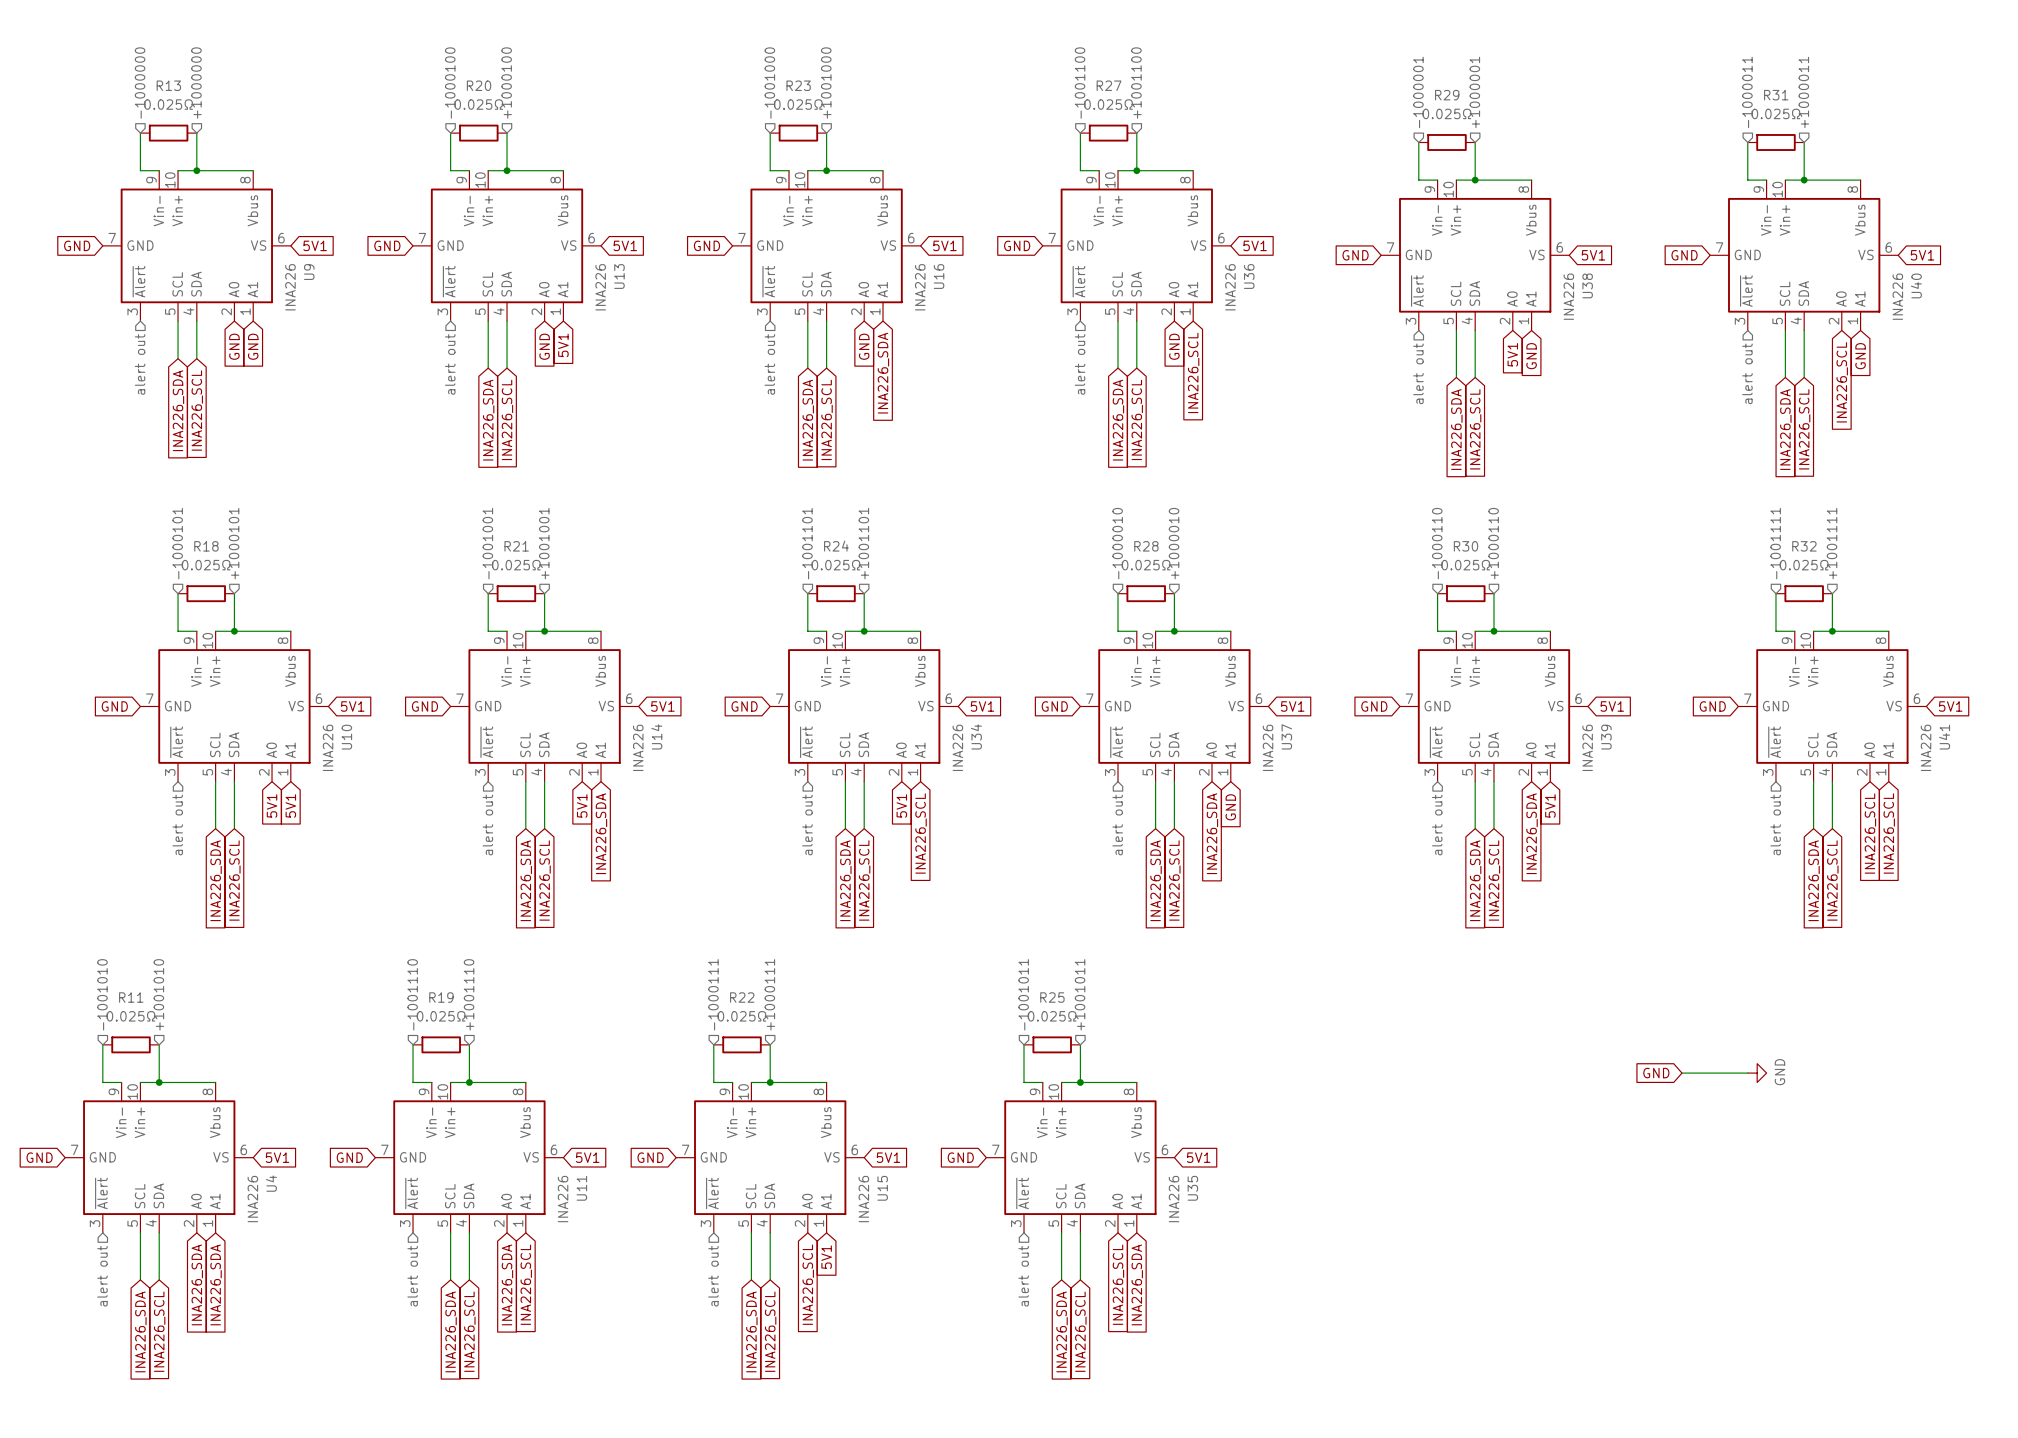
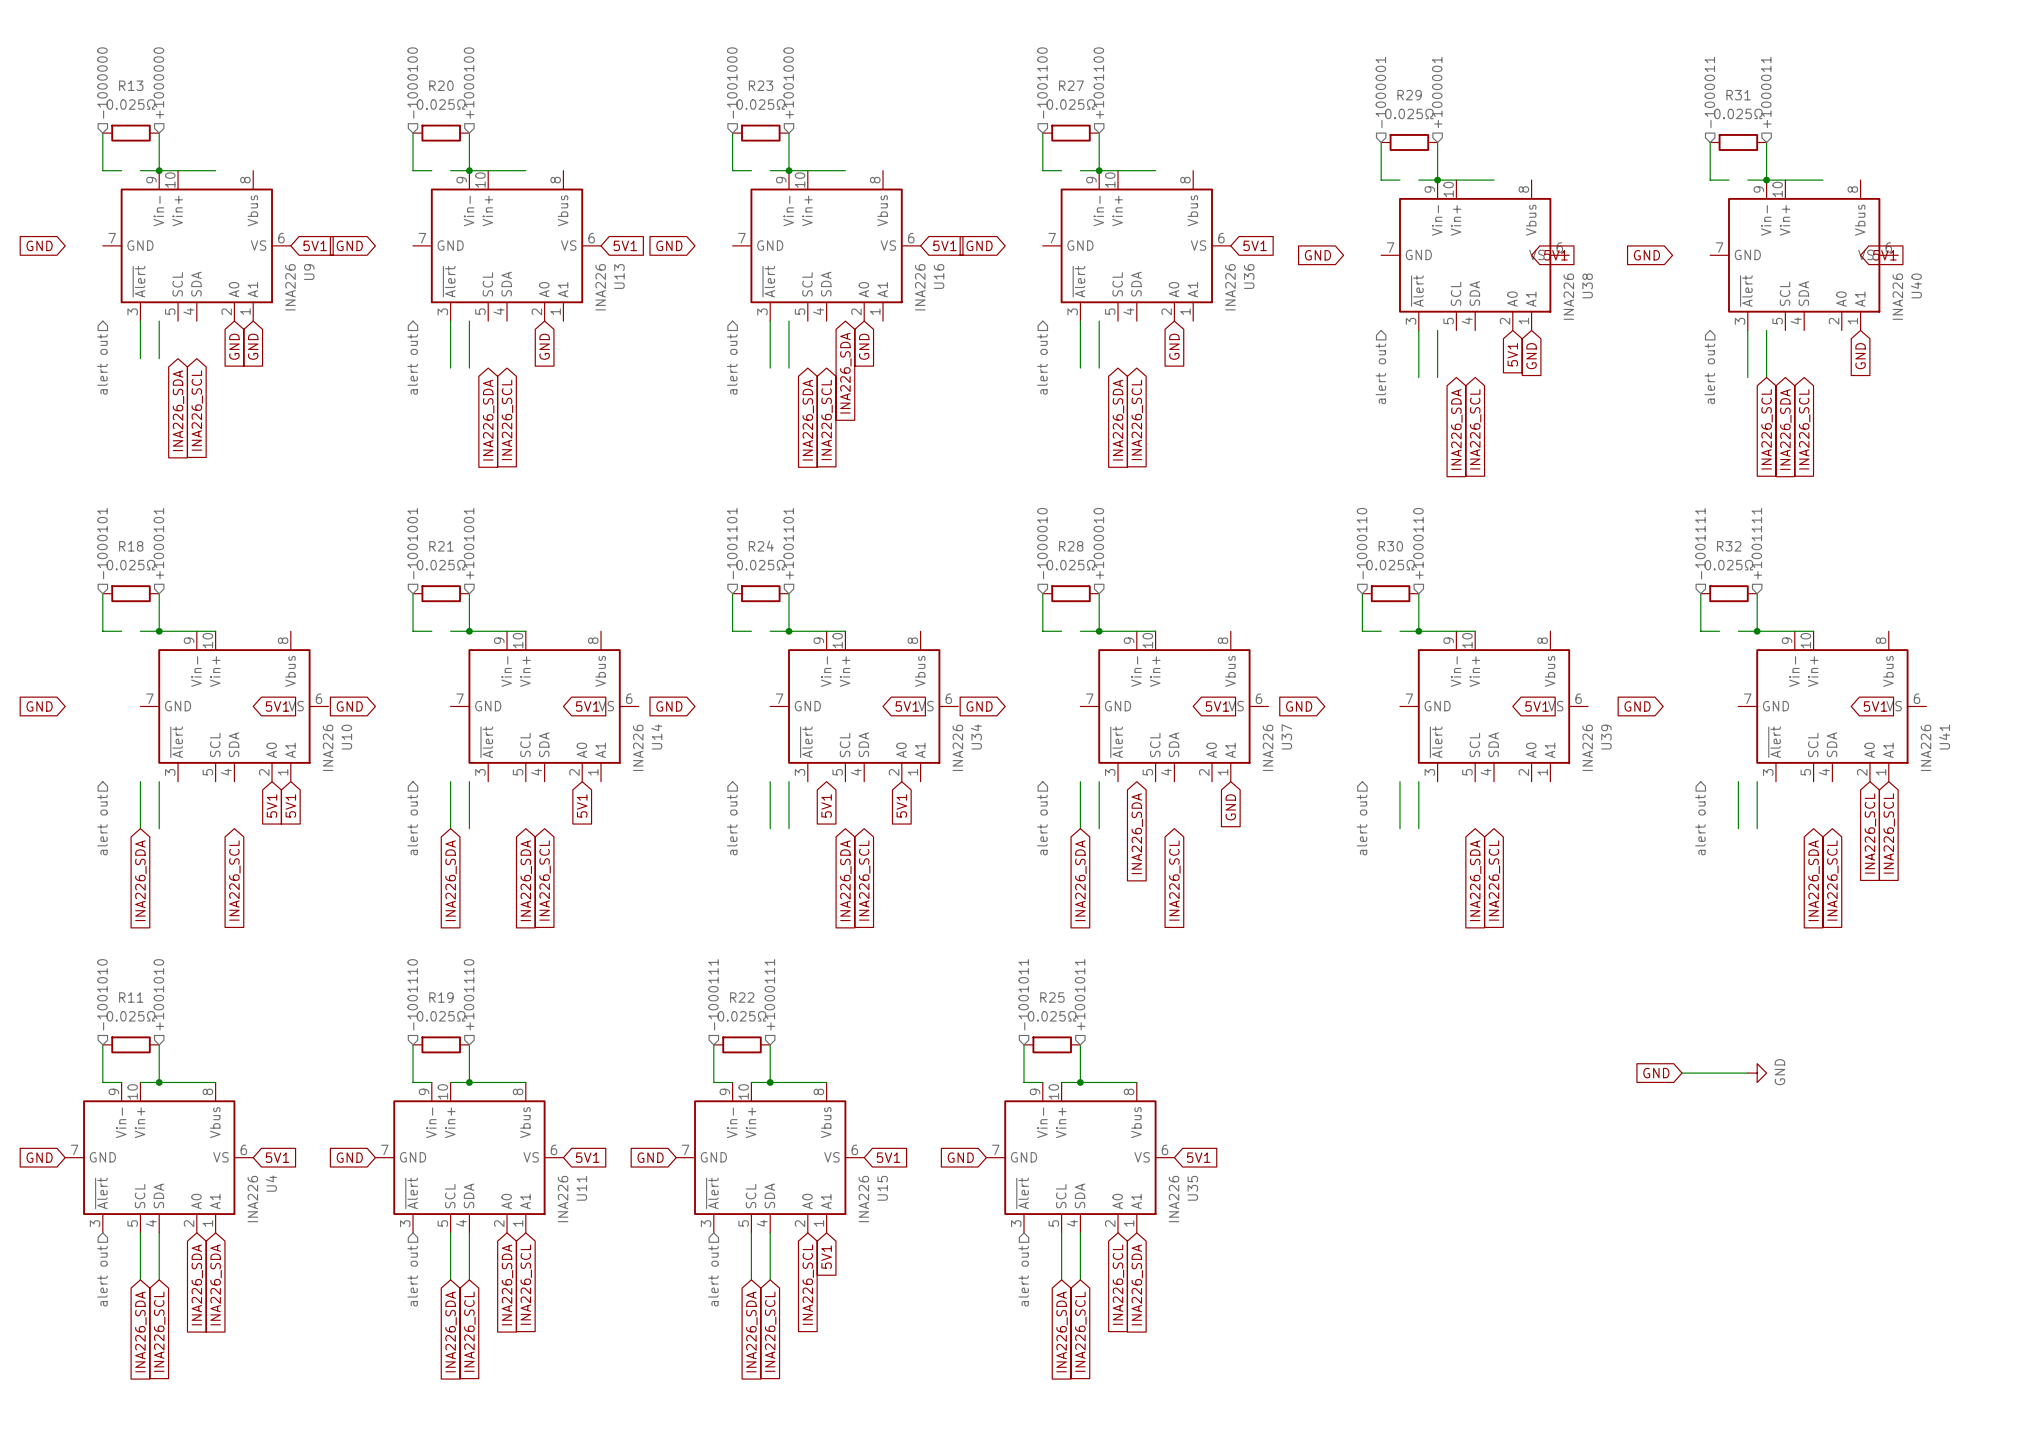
hierarchical label position: -1000000 (140, 83) -> -1000000 (102, 83)
hierarchical label position: +1000000 (196, 83) -> +1000000 (158, 83)
hierarchical label position: -1000100 (450, 83) -> -1000100 (412, 83)
hierarchical label position: +1000100 (506, 83) -> +1000100 (469, 83)
hierarchical label position: -1001000 (769, 83) -> -1001000 (732, 83)
hierarchical label position: +1001000 (826, 83) -> +1001000 (788, 83)
hierarchical label position: -1001100 (1080, 83) -> -1001100 (1042, 83)
hierarchical label position: +1001100 (1136, 83) -> +1001100 (1098, 83)
hierarchical label position: -1000001 (1418, 92) -> -1000001 (1380, 92)
hierarchical label position: +1000001 (1474, 92) -> +1000001 (1437, 92)
hierarchical label position: -1000011 (1747, 92) -> -1000011 (1709, 92)
hierarchical label position: +1000011 (1803, 92) -> +1000011 (1766, 92)
wire: none -> (102, 133) (102, 170) (121, 170)
wire: (140, 133) (140, 170) -> none
wire: none -> (159, 133) (159, 170) (178, 170)
R13 position: (168, 133) -> (131, 133)
wire: (196, 133) (196, 170) -> none
wire: none -> (413, 133) (413, 170) (431, 170)
wire: (450, 133) (450, 170) -> none
wire: none -> (469, 133) (469, 170) (488, 170)
R20 position: (478, 133) -> (441, 133)
wire: (507, 133) (507, 170) -> none
wire: none -> (732, 133) (732, 170) (751, 170)
wire: (770, 133) (770, 170) -> none
wire: none -> (789, 133) (789, 170) (807, 170)
R23 position: (798, 133) -> (760, 133)
wire: (826, 133) (826, 170) -> none
wire: none -> (1042, 133) (1042, 170) (1061, 170)
wire: (1080, 133) (1080, 170) -> none
wire: none -> (1099, 133) (1099, 170) (1118, 170)
R27 position: (1108, 133) -> (1071, 133)
wire: (1136, 133) (1136, 170) -> none
wire: none -> (1381, 142) (1381, 180) (1399, 180)
wire: (1418, 142) (1418, 180) -> none
wire: none -> (1437, 142) (1437, 180) (1456, 180)
R29 position: (1446, 142) -> (1409, 142)
wire: (1475, 142) (1475, 180) -> none
wire: none -> (1710, 142) (1710, 180) (1728, 180)
wire: (1747, 142) (1747, 180) -> none
wire: none -> (1766, 142) (1766, 180) (1785, 180)
R31 position: (1775, 142) -> (1738, 142)
wire: (1804, 142) (1804, 180) -> none
junction position: (196, 170) -> (159, 170)
wire: (215, 170) (253, 170) -> none
junction position: (507, 170) -> (469, 170)
wire: (525, 170) (563, 170) -> none
junction position: (826, 170) -> (789, 170)
wire: (845, 170) (883, 170) -> none
junction position: (1136, 170) -> (1099, 170)
wire: (1155, 170) (1193, 170) -> none
junction position: (1475, 180) -> (1437, 180)
wire: (1493, 180) (1531, 180) -> none
junction position: (1804, 180) -> (1766, 180)
wire: (1822, 180) (1860, 180) -> none
global label position: GND (77, 245) -> GND (39, 245)
global label position: GND (387, 245) -> GND (349, 245)
global label position: GND (706, 245) -> GND (669, 245)
global label position: GND (1017, 245) -> GND (979, 245)
global label position: GND (1355, 255) -> GND (1317, 255)
global label position: 5V1 (1593, 255) -> 5V1 (1555, 255)
global label position: GND (1684, 255) -> GND (1646, 255)
global label position: 5V1 (1922, 255) -> 5V1 (1884, 255)
wire: (178, 321) (178, 358) -> (159, 321) (159, 358)
wire: (196, 321) (196, 358) -> (140, 321) (140, 358)
wire: (488, 321) (488, 368) -> (469, 321) (469, 368)
wire: (507, 321) (507, 368) -> (450, 321) (450, 368)
wire: (807, 321) (807, 368) -> (789, 321) (789, 368)
wire: (826, 321) (826, 368) -> (770, 321) (770, 368)
wire: (1118, 321) (1118, 368) -> (1099, 321) (1099, 368)
wire: (1136, 321) (1136, 368) -> (1080, 321) (1080, 368)
wire: (1456, 330) (1456, 377) -> (1437, 330) (1437, 377)
wire: (1475, 330) (1475, 377) -> (1418, 330) (1418, 377)
wire: (1785, 330) (1785, 377) -> (1766, 330) (1766, 377)
wire: (1804, 330) (1804, 377) -> (1747, 330) (1747, 377)
global label: 5V1 (563, 345) -> none
hierarchical label position: alert out (140, 364) -> alert out (102, 364)
hierarchical label position: alert out (450, 364) -> alert out (412, 364)
hierarchical label position: alert out (769, 364) -> alert out (732, 364)
hierarchical label position: alert out (1080, 364) -> alert out (1042, 364)
global label: INA226_SCL (1193, 372) -> none
global label position: INA226_SDA (883, 373) -> INA226_SDA (845, 373)
hierarchical label position: alert out (1418, 373) -> alert out (1380, 373)
hierarchical label position: alert out (1747, 373) -> alert out (1709, 373)
global label position: INA226_SCL (1842, 382) -> INA226_SCL (1767, 429)
hierarchical label position: -1000101 (177, 543) -> -1000101 (102, 543)
hierarchical label position: +1000101 (234, 543) -> +1000101 (158, 543)
hierarchical label position: -1001001 (487, 543) -> -1001001 (412, 543)
hierarchical label position: +1001001 (544, 543) -> +1001001 (469, 543)
hierarchical label position: -1001101 (807, 543) -> -1001101 (732, 543)
hierarchical label position: +1001101 (863, 543) -> +1001101 (788, 543)
hierarchical label position: -1000010 (1117, 543) -> -1000010 (1042, 543)
hierarchical label position: +1000010 (1174, 543) -> +1000010 (1098, 543)
hierarchical label position: -1000110 (1437, 543) -> -1000110 (1362, 543)
hierarchical label position: +1000110 (1493, 543) -> +1000110 (1418, 543)
hierarchical label position: -1001111 (1775, 543) -> -1001111 (1700, 543)
hierarchical label position: +1001111 (1832, 543) -> +1001111 (1756, 543)
wire: none -> (102, 593) (102, 631) (121, 631)
wire: (178, 593) (178, 631) -> (140, 631) (178, 631)
R18 position: (206, 593) -> (131, 593)
wire: (234, 593) (234, 631) -> (159, 593) (159, 631)
wire: none -> (413, 593) (413, 631) (431, 631)
wire: (488, 593) (488, 631) -> (450, 631) (488, 631)
R21 position: (516, 593) -> (441, 593)
wire: (544, 593) (544, 631) -> (469, 593) (469, 631)
wire: none -> (732, 593) (732, 631) (751, 631)
wire: (807, 593) (807, 631) -> (770, 631) (807, 631)
R24 position: (836, 593) -> (760, 593)
wire: (864, 593) (864, 631) -> (789, 593) (789, 631)
wire: none -> (1042, 593) (1042, 631) (1061, 631)
wire: (1118, 593) (1118, 631) -> (1080, 631) (1118, 631)
R28 position: (1146, 593) -> (1071, 593)
wire: (1174, 593) (1174, 631) -> (1099, 593) (1099, 631)
wire: none -> (1362, 593) (1362, 631) (1381, 631)
wire: (1437, 593) (1437, 631) -> (1399, 631) (1437, 631)
R30 position: (1465, 593) -> (1390, 593)
wire: (1493, 593) (1493, 631) -> (1418, 593) (1418, 631)
wire: none -> (1700, 593) (1700, 631) (1719, 631)
wire: (1775, 593) (1775, 631) -> (1738, 631) (1775, 631)
R32 position: (1804, 593) -> (1728, 593)
wire: (1832, 593) (1832, 631) -> (1757, 593) (1757, 631)
junction: none -> (159, 631)
wire: (215, 631) (290, 631) -> (215, 631) (196, 631)
junction: (234, 631) -> none
junction: none -> (469, 631)
wire: (525, 631) (601, 631) -> (525, 631) (507, 631)
junction: (544, 631) -> none
junction: none -> (789, 631)
wire: (845, 631) (920, 631) -> (845, 631) (826, 631)
junction: (864, 631) -> none
junction: none -> (1099, 631)
wire: (1155, 631) (1230, 631) -> (1155, 631) (1136, 631)
junction: (1174, 631) -> none
junction: none -> (1418, 631)
wire: (1475, 631) (1550, 631) -> (1475, 631) (1456, 631)
junction: (1493, 631) -> none
junction: none -> (1757, 631)
wire: (1813, 631) (1888, 631) -> (1813, 631) (1794, 631)
junction: (1832, 631) -> none
global label position: GND (114, 706) -> GND (39, 706)
global label position: 5V1 (352, 706) -> 5V1 (277, 706)
global label position: GND (424, 706) -> GND (349, 706)
global label position: 5V1 (662, 706) -> 5V1 (587, 706)
global label position: GND (744, 706) -> GND (669, 706)
global label position: 5V1 (982, 706) -> 5V1 (907, 706)
global label position: GND (1054, 706) -> GND (979, 706)
global label position: 5V1 (1292, 706) -> 5V1 (1217, 706)
global label position: GND (1374, 706) -> GND (1299, 706)
global label: none -> 5V1 (1537, 706)
global label: 5V1 (1612, 706) -> none
global label position: GND (1712, 706) -> GND (1637, 706)
global label position: 5V1 (1950, 706) -> 5V1 (1875, 706)
wire: (215, 781) (215, 828) -> (140, 781) (140, 828)
wire: (234, 781) (234, 828) -> (159, 781) (159, 828)
wire: (525, 781) (525, 828) -> (450, 781) (450, 828)
wire: (544, 781) (544, 828) -> (469, 781) (469, 828)
wire: (845, 781) (845, 828) -> (770, 781) (770, 828)
wire: (864, 781) (864, 828) -> (789, 781) (789, 828)
wire: (1155, 781) (1155, 828) -> (1080, 781) (1080, 828)
wire: (1174, 781) (1174, 828) -> (1099, 781) (1099, 828)
wire: (1475, 781) (1475, 828) -> (1399, 781) (1399, 828)
wire: (1493, 781) (1493, 828) -> (1418, 781) (1418, 828)
wire: (1813, 781) (1813, 828) -> (1738, 781) (1738, 828)
wire: (1832, 781) (1832, 828) -> (1757, 781) (1757, 828)
global label: none -> 5V1 (826, 805)
global label: 5V1 (1550, 805) -> none
hierarchical label position: alert out (177, 825) -> alert out (102, 825)
hierarchical label position: alert out (487, 825) -> alert out (412, 825)
hierarchical label position: alert out (807, 825) -> alert out (732, 825)
hierarchical label position: alert out (1117, 825) -> alert out (1042, 825)
hierarchical label position: alert out (1437, 825) -> alert out (1362, 825)
hierarchical label position: alert out (1775, 825) -> alert out (1700, 825)
global label: INA226_SDA (601, 833) -> none
global label: INA226_SCL (921, 833) -> none
global label: INA226_SDA (1212, 833) -> none
global label: INA226_SDA (1532, 833) -> none
global label position: INA226_SDA (216, 880) -> INA226_SDA (140, 880)
global label: none -> INA226_SDA (451, 880)
global label: none -> INA226_SDA (1080, 880)
global label position: INA226_SDA (1156, 880) -> INA226_SDA (1137, 833)

